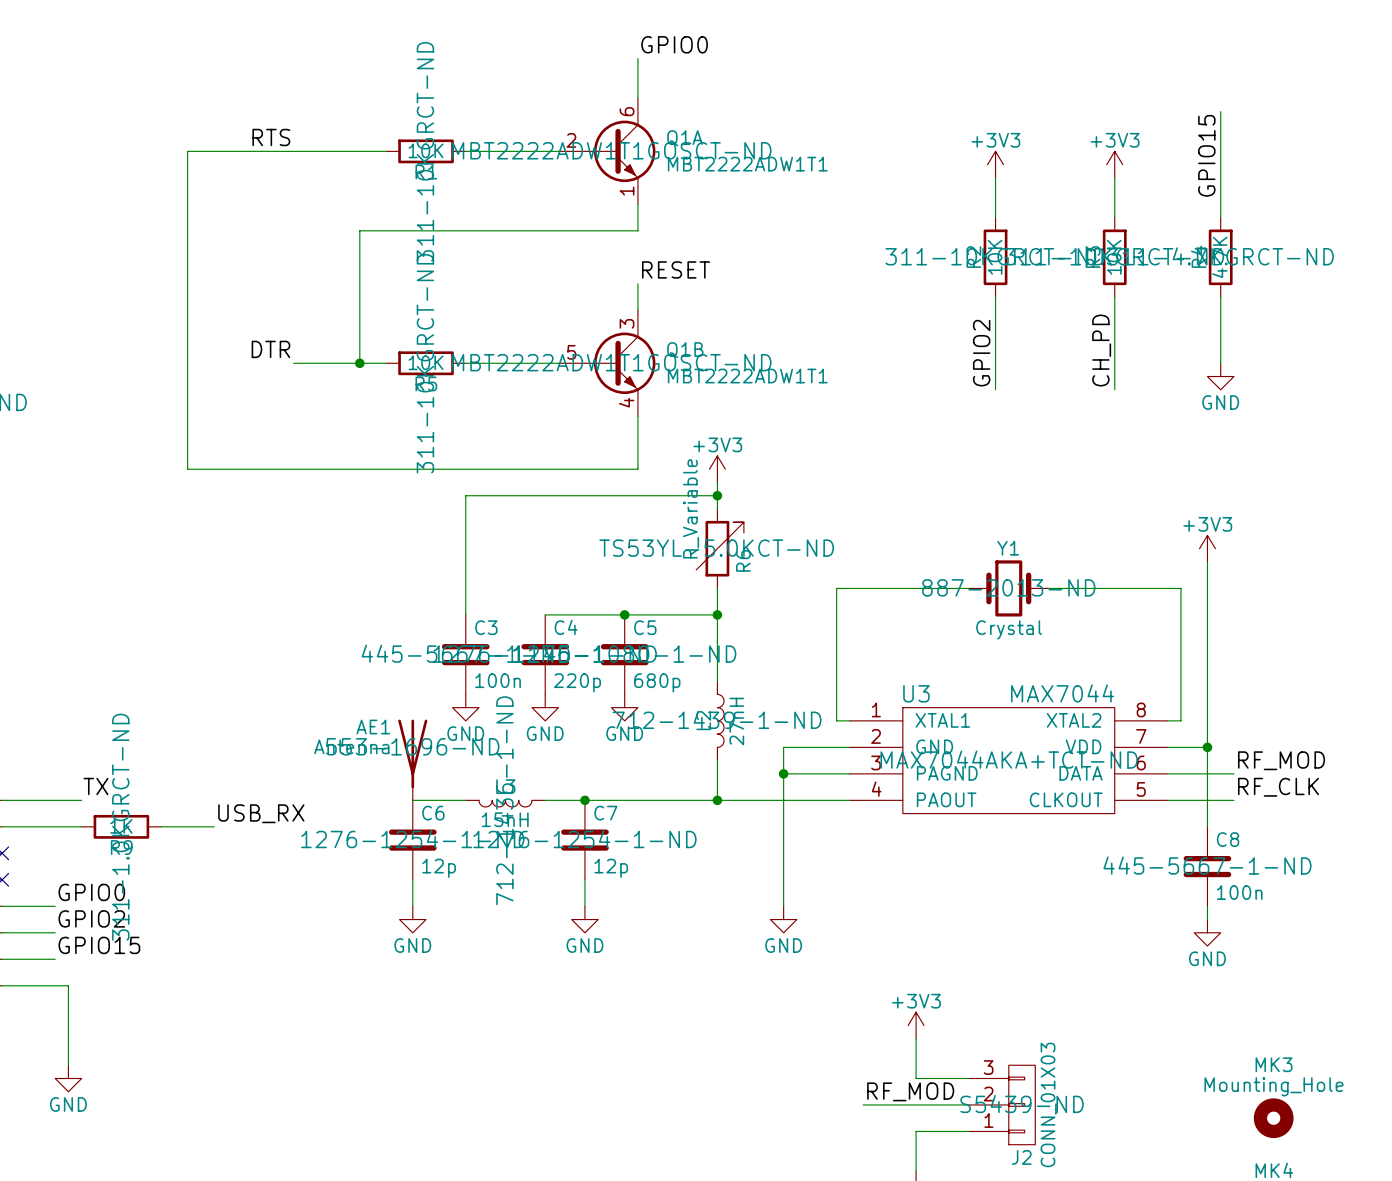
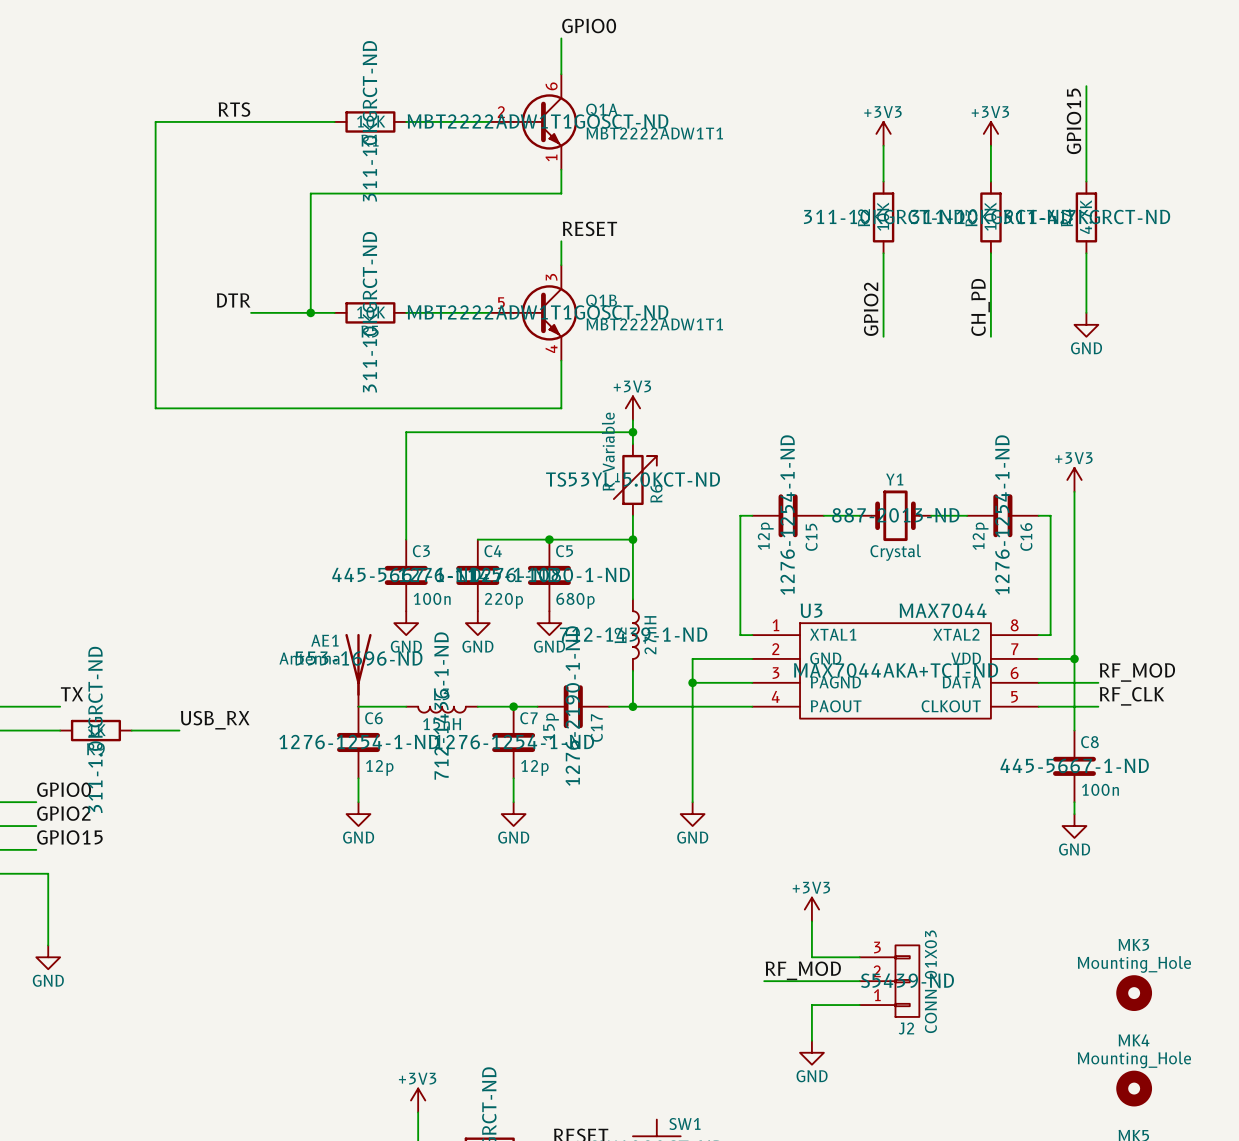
C15: none -> 12p (788, 515)
C16: none -> 12p (1002, 515)
C17: none -> 15p (573, 706)

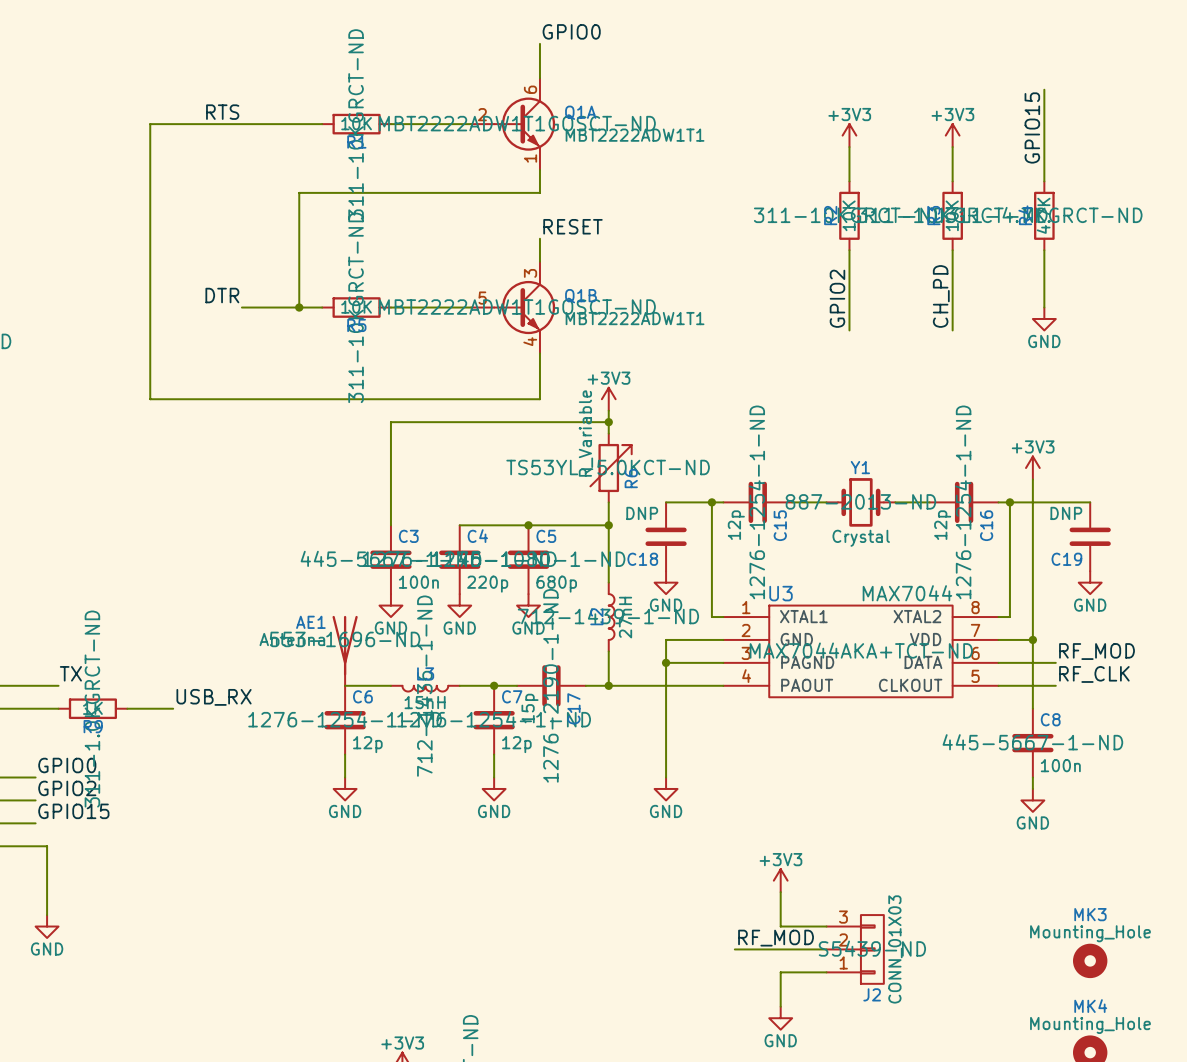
wire: none -> (666, 502) (711, 502)
junction: none -> (711, 502)
wire: none -> (1009, 502) (1090, 502)
junction: none -> (1009, 502)
C18: none -> DNP (666, 536)
C19: none -> DNP (1090, 536)
power symbol: none -> GND (666, 582)
power symbol: none -> GND (1090, 582)

